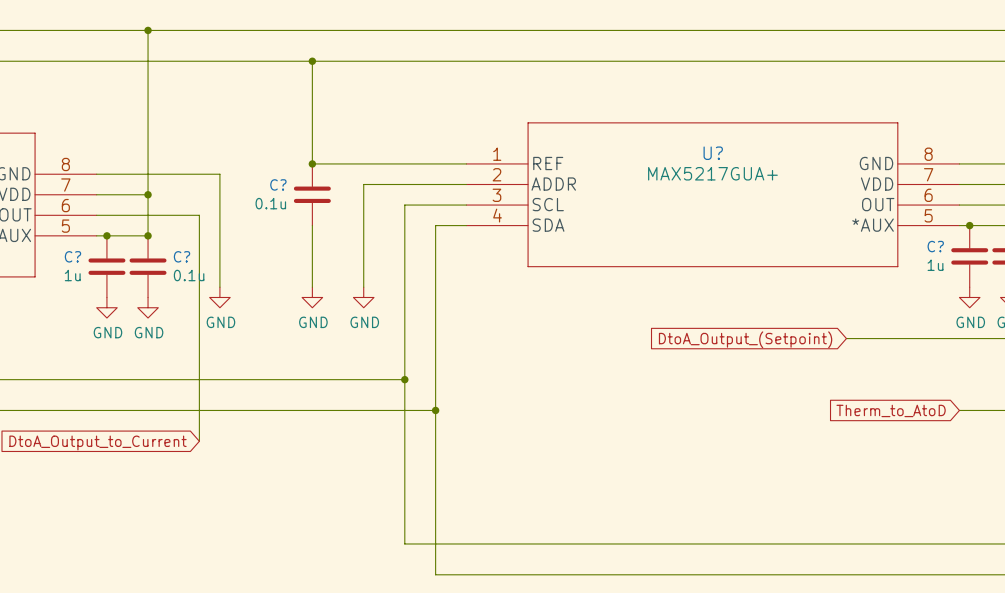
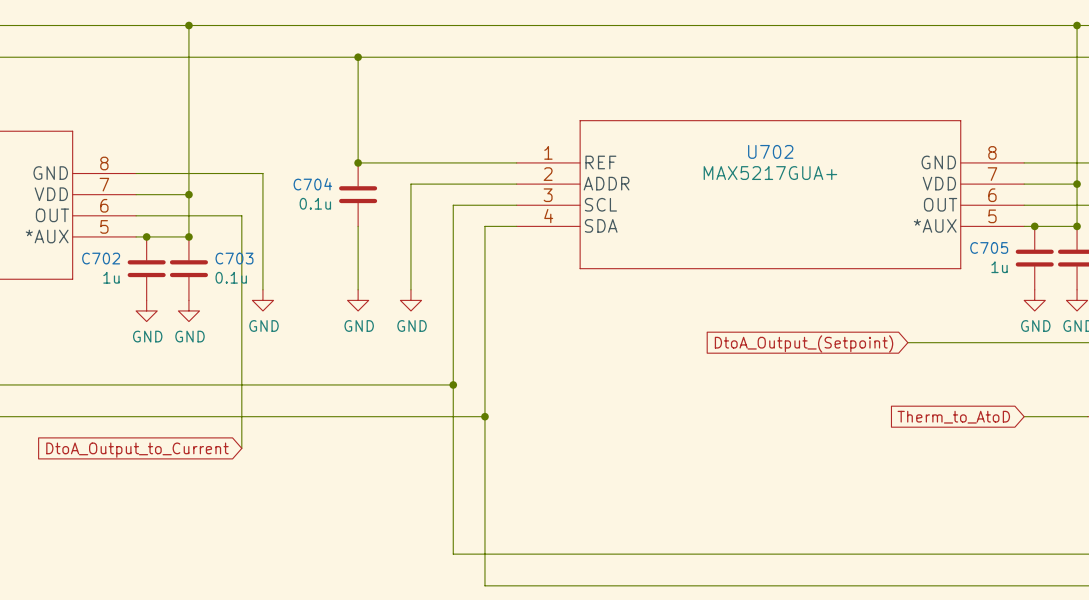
U? name: U? (713, 153) -> U702 (770, 151)
C? name: C? (278, 184) -> C704 (312, 184)
C? name: C? (935, 246) -> C705 (989, 247)
C? name: C? (72, 256) -> C702 (101, 258)
C? name: C? (182, 256) -> C703 (234, 258)

